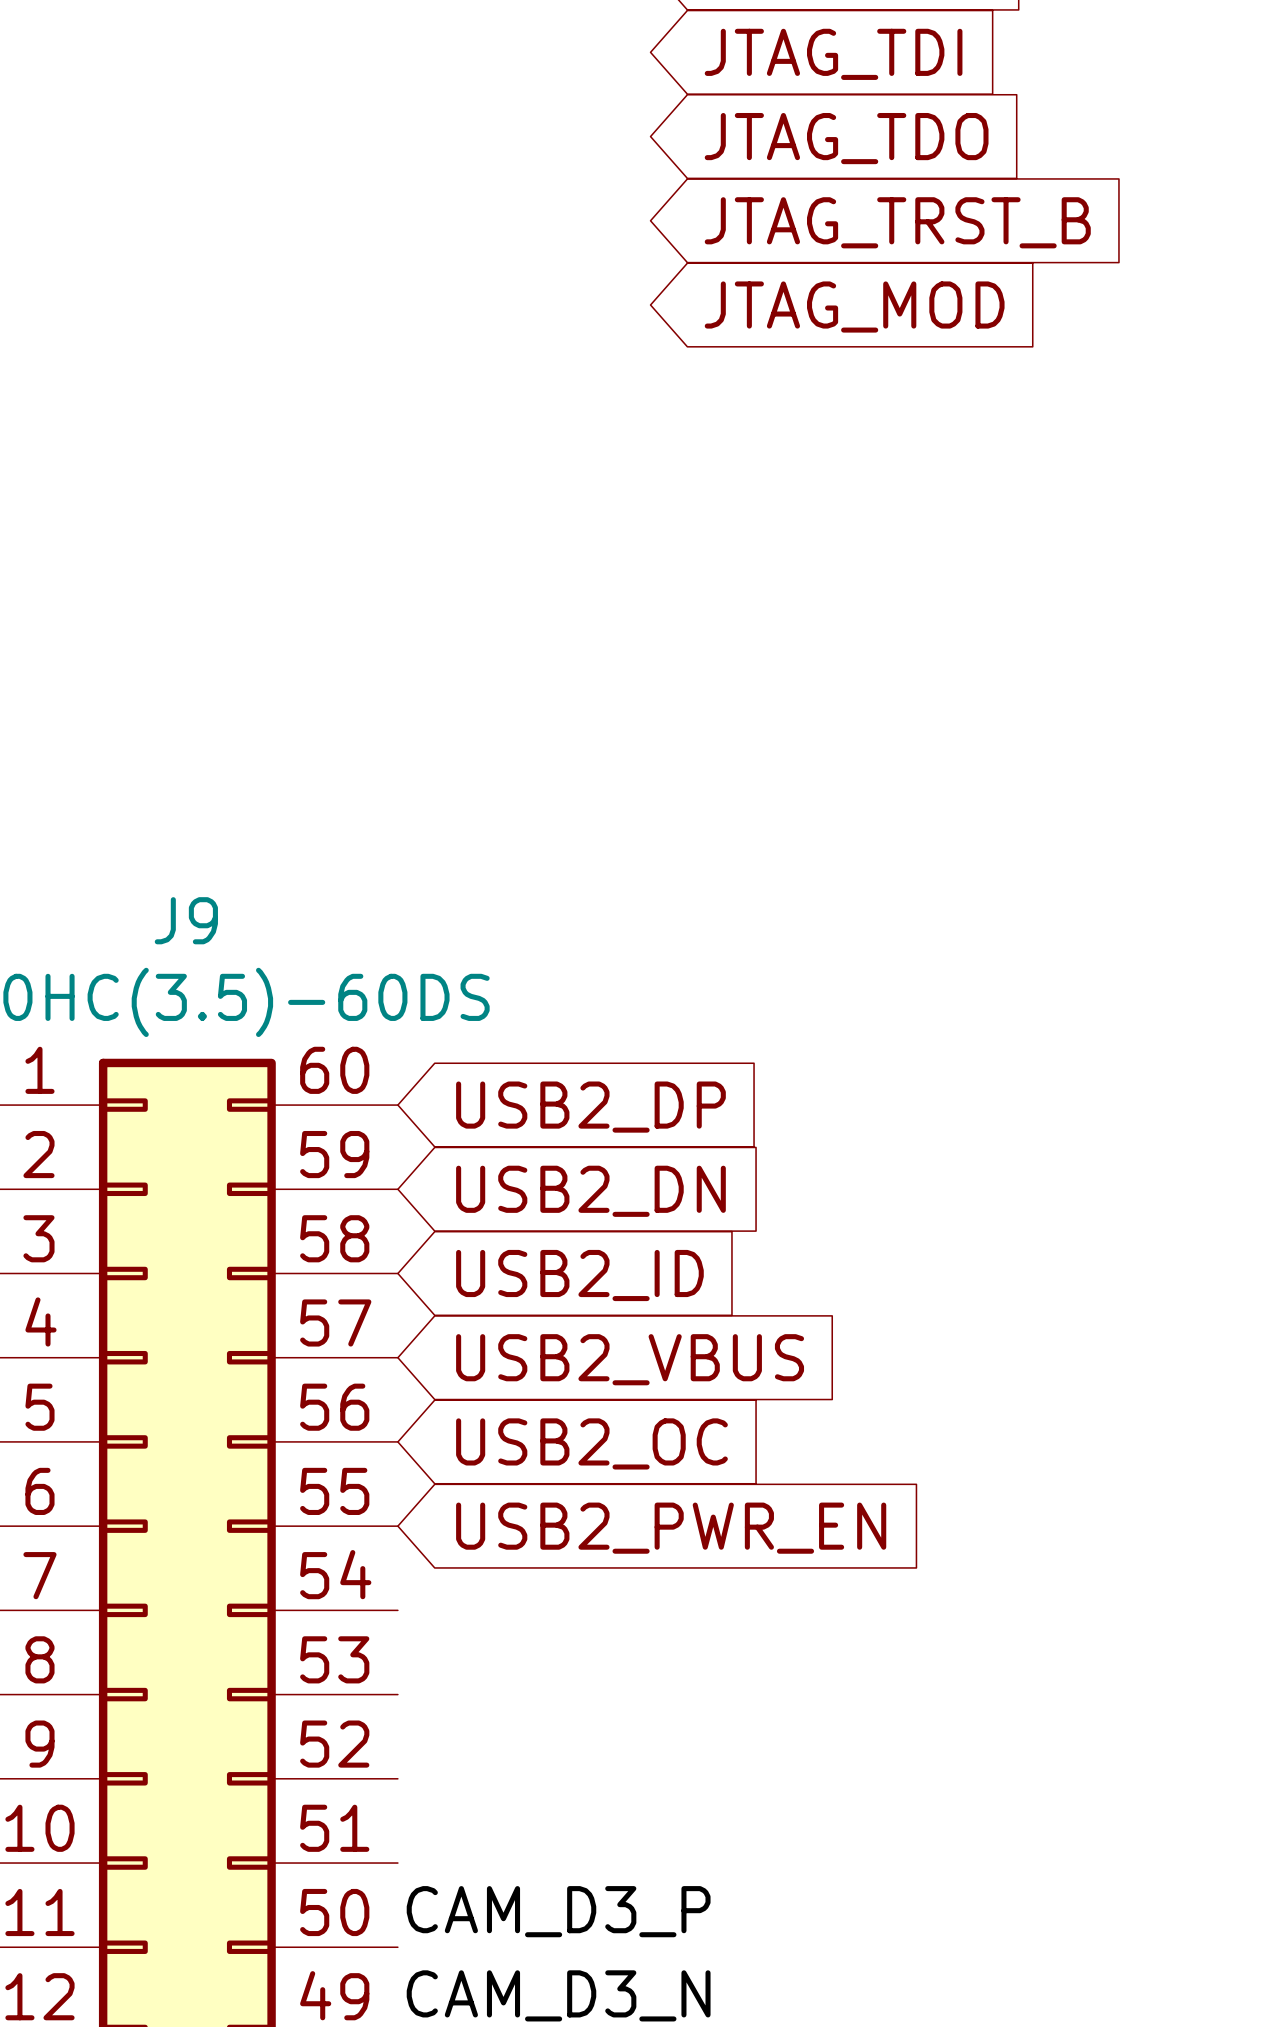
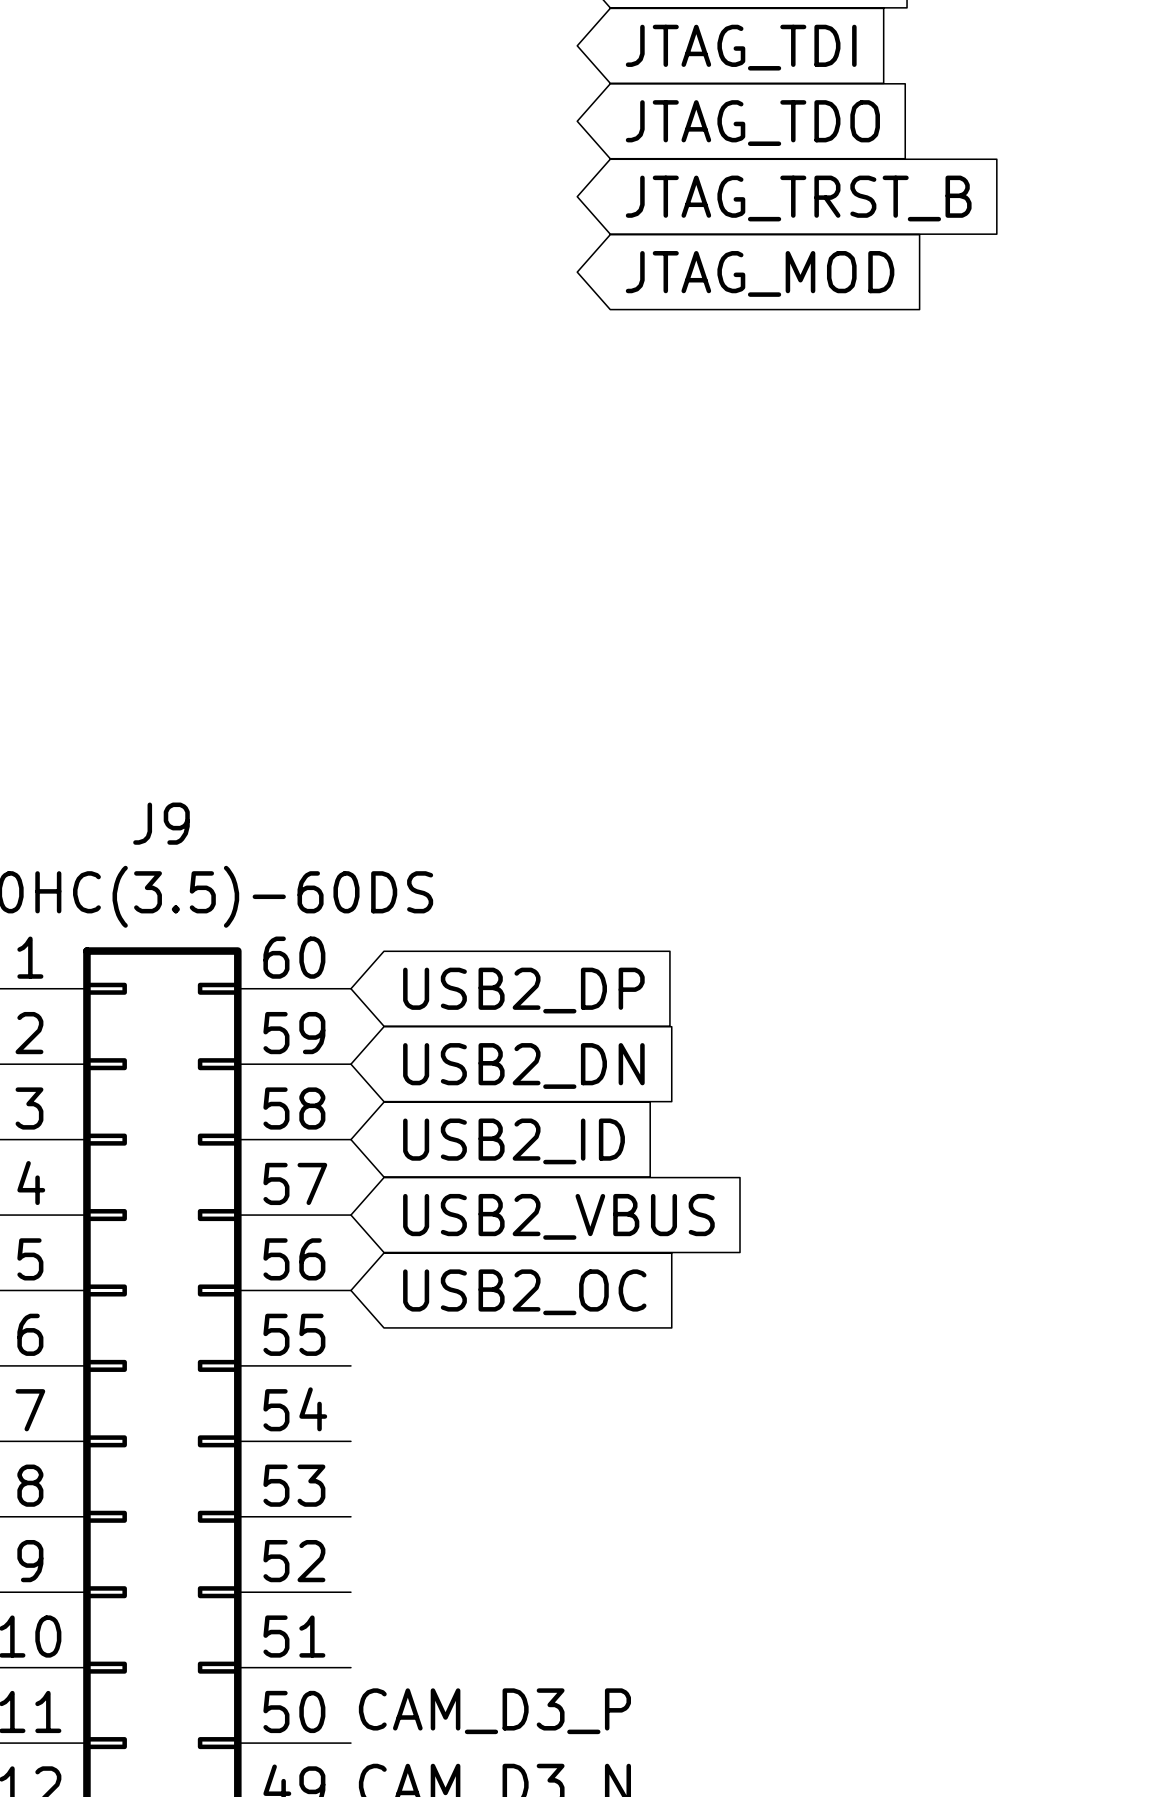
global label: USB2_PWR_EN (671, 1528) -> none

